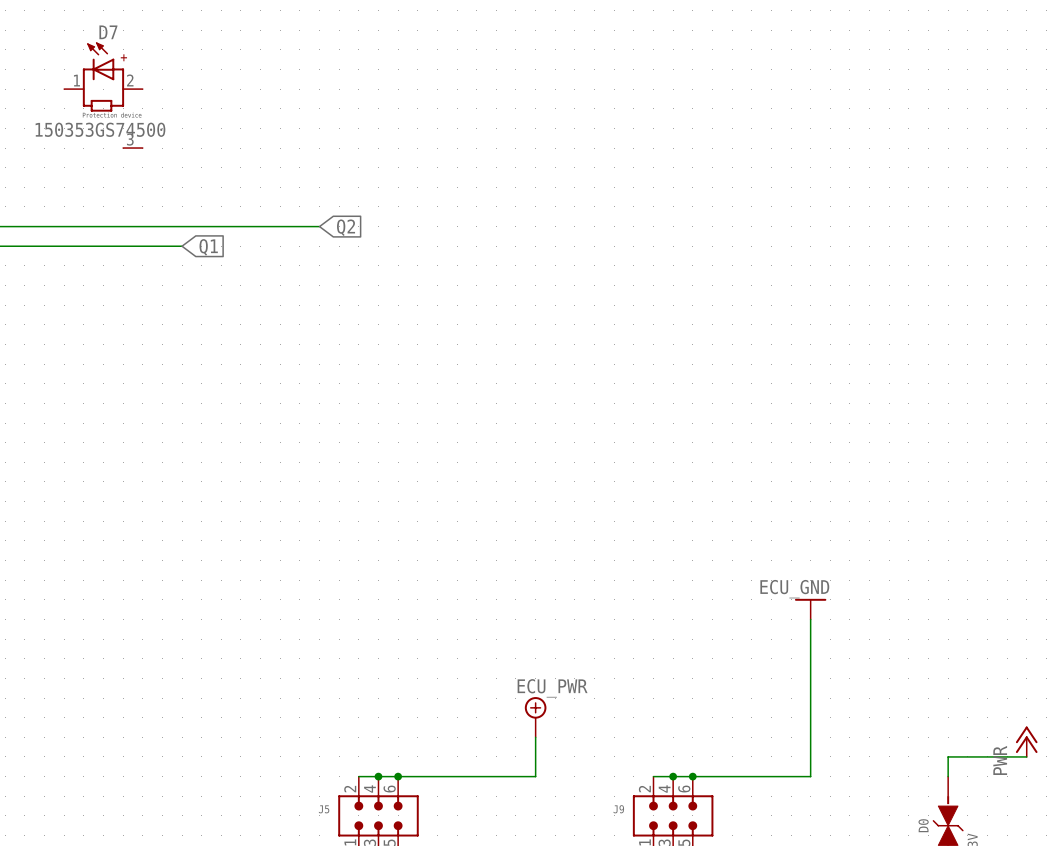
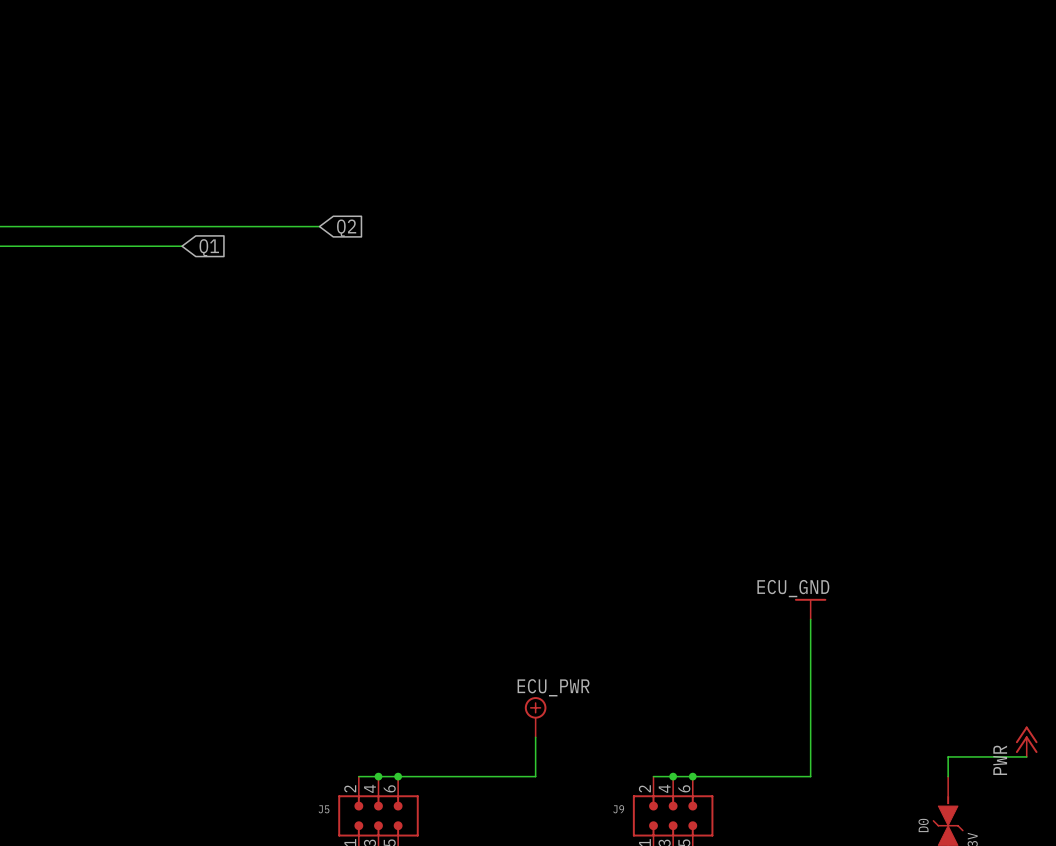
D7: 150353GS74500 (103, 95) -> none

